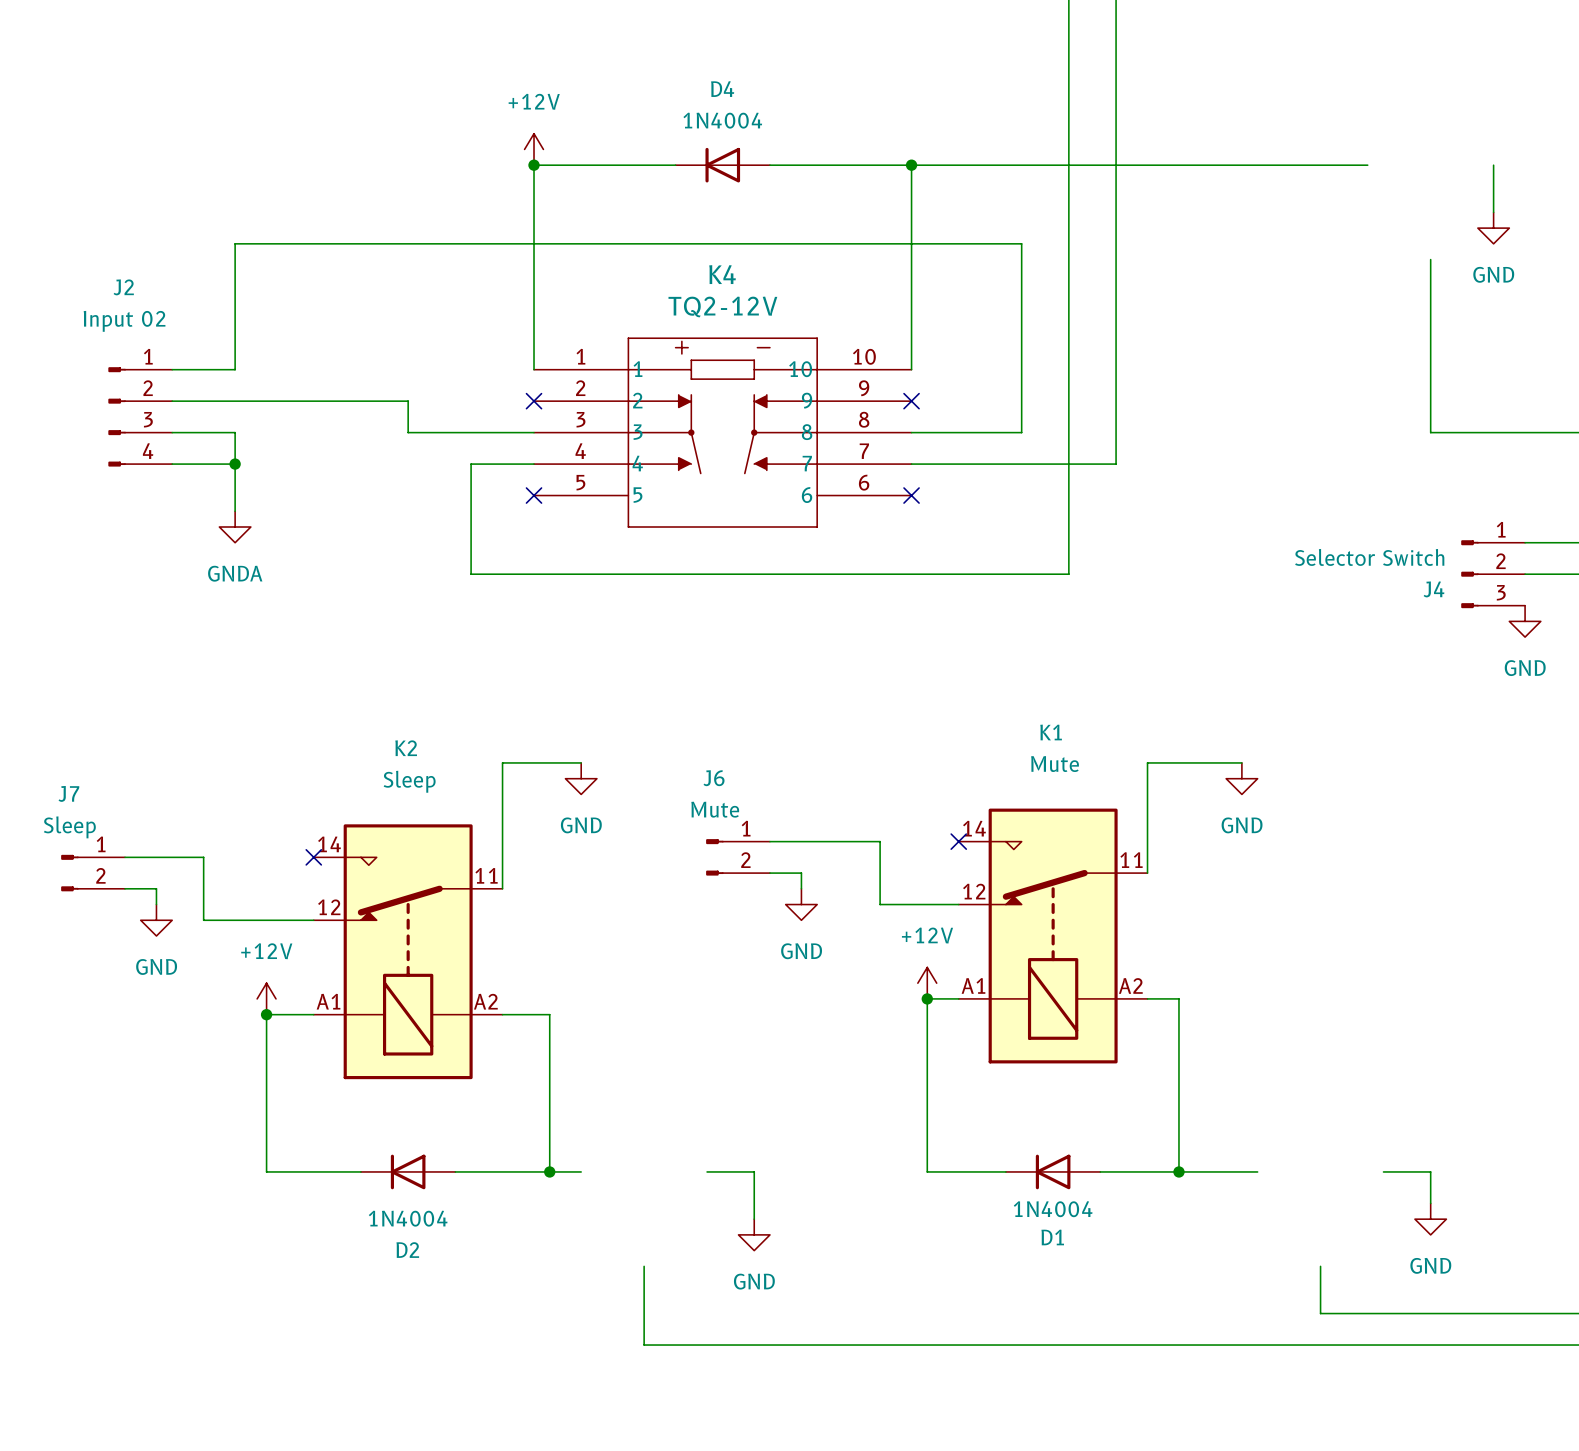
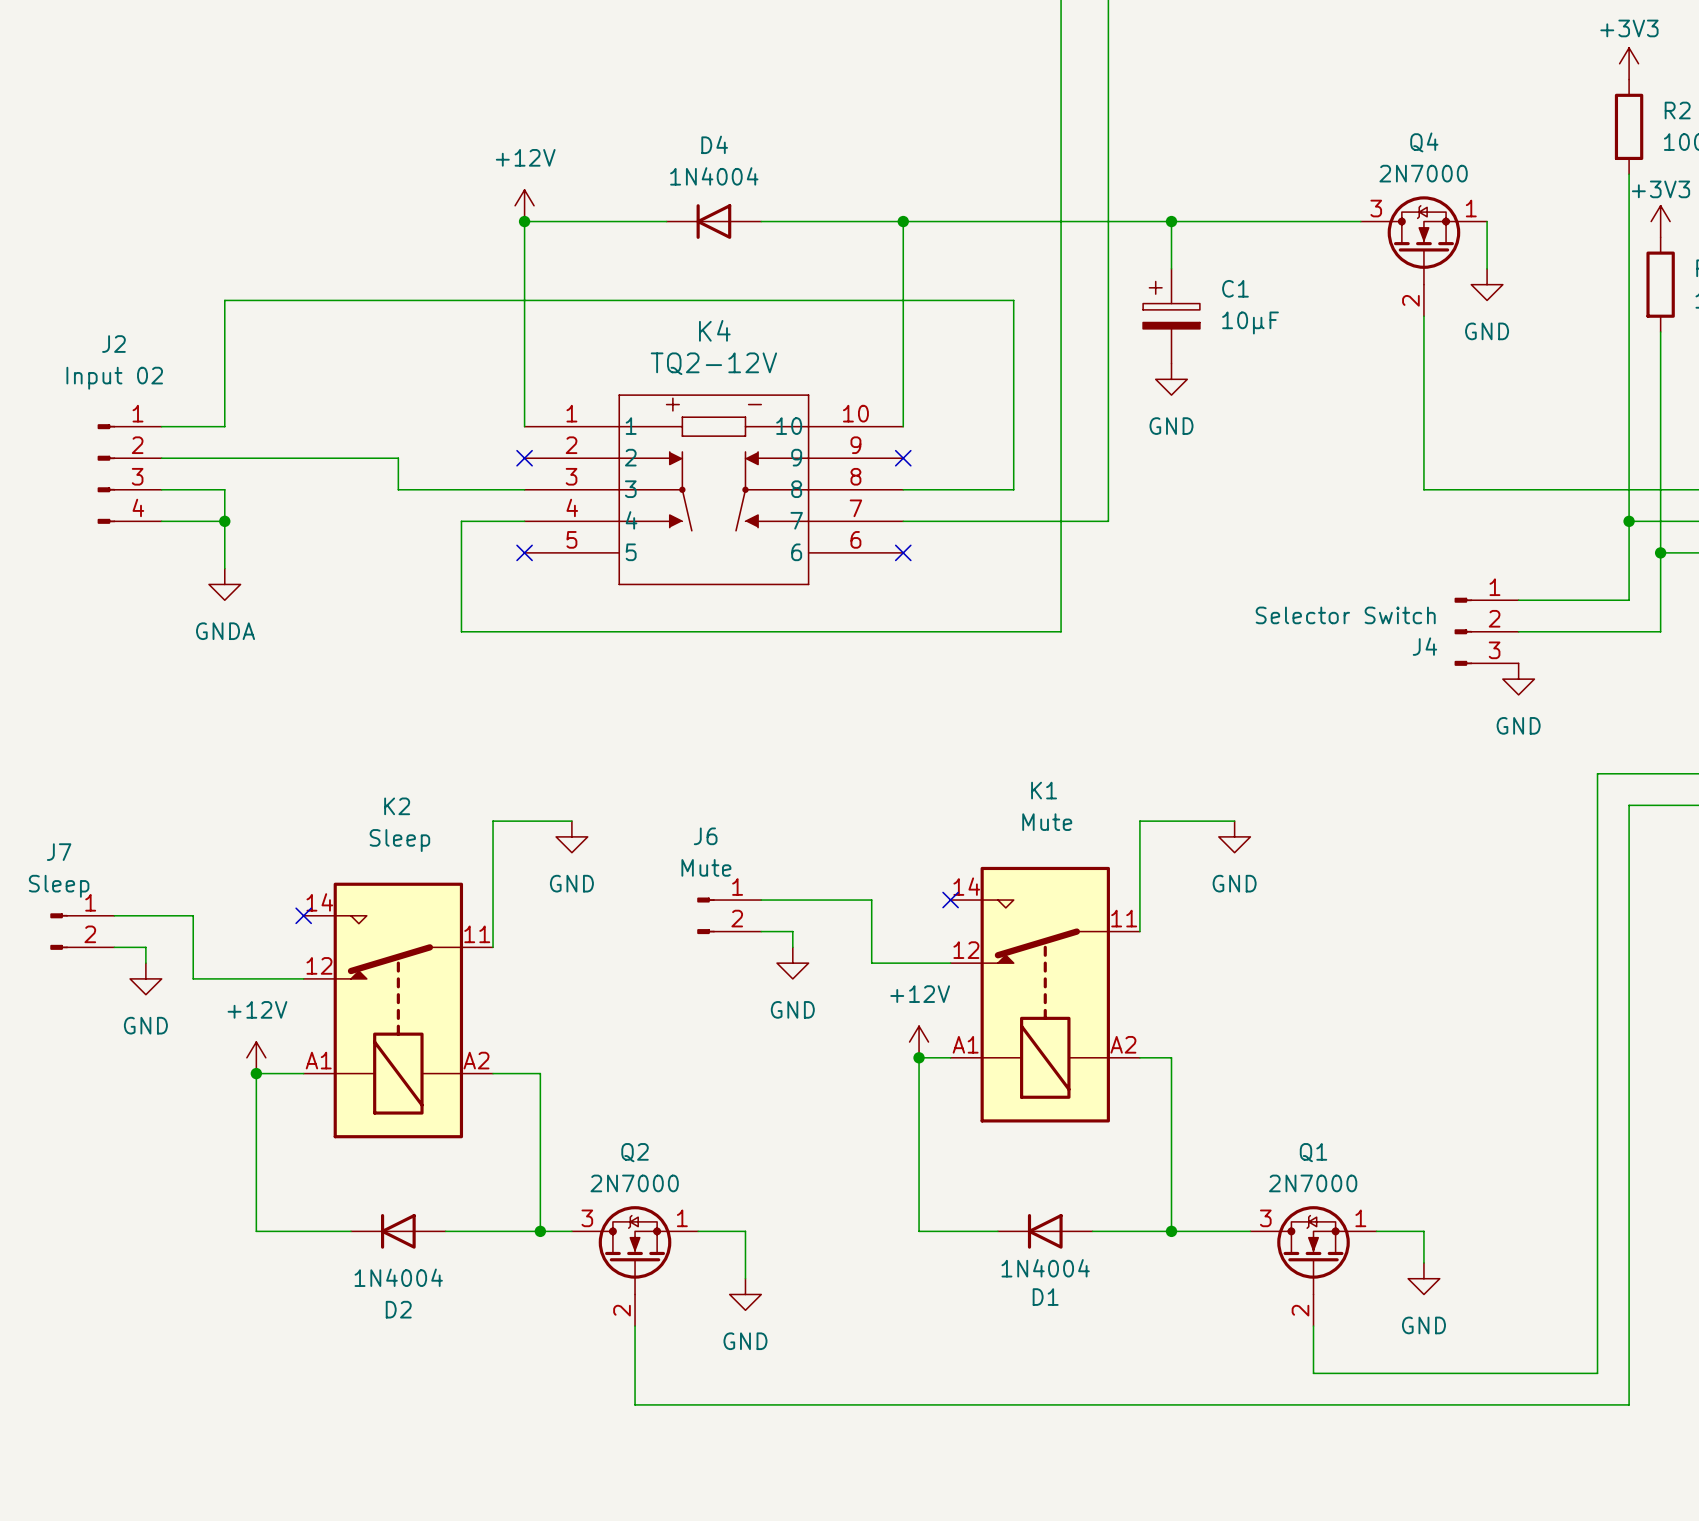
wire: none -> (1171, 221) (1171, 268)
junction: none -> (1171, 221)
Q4: none -> 2N7000 (1423, 256)
C1: none -> 10µF (1171, 316)
power symbol: none -> GND (1171, 379)
Q2: none -> 2N7000 (635, 1266)
Q1: none -> 2N7000 (1313, 1266)

